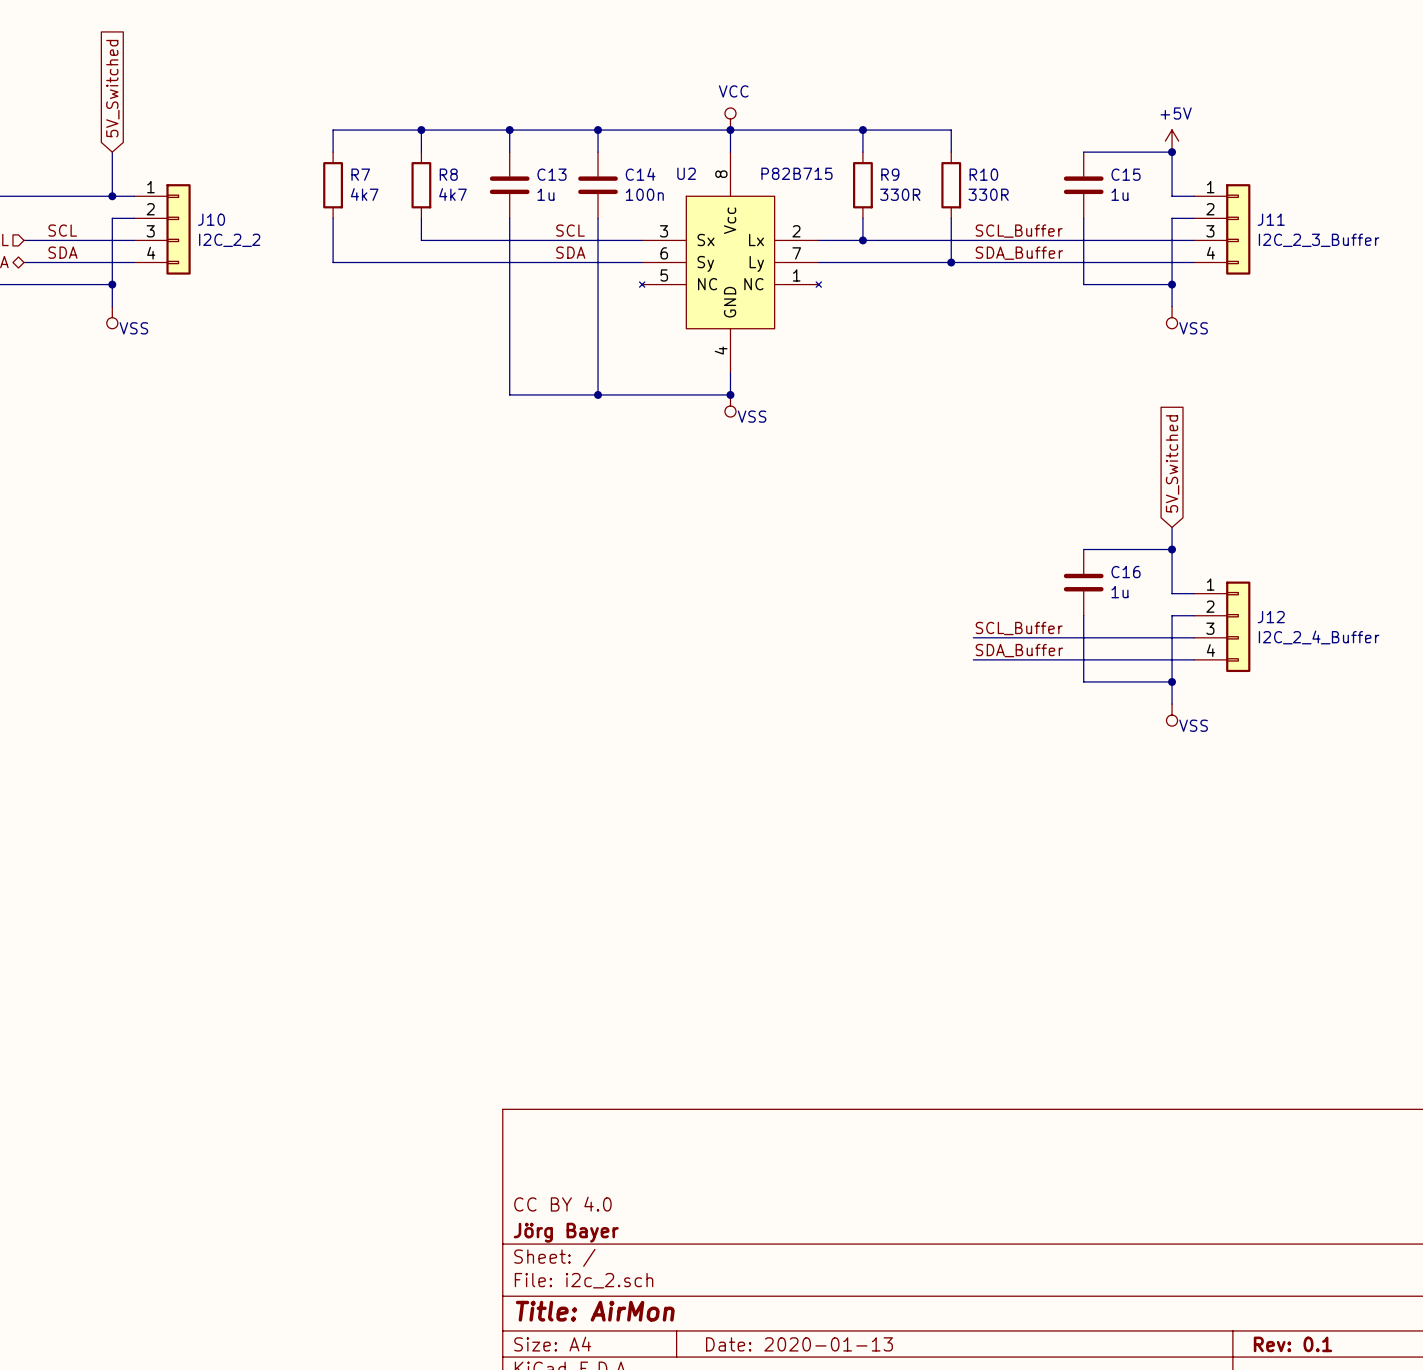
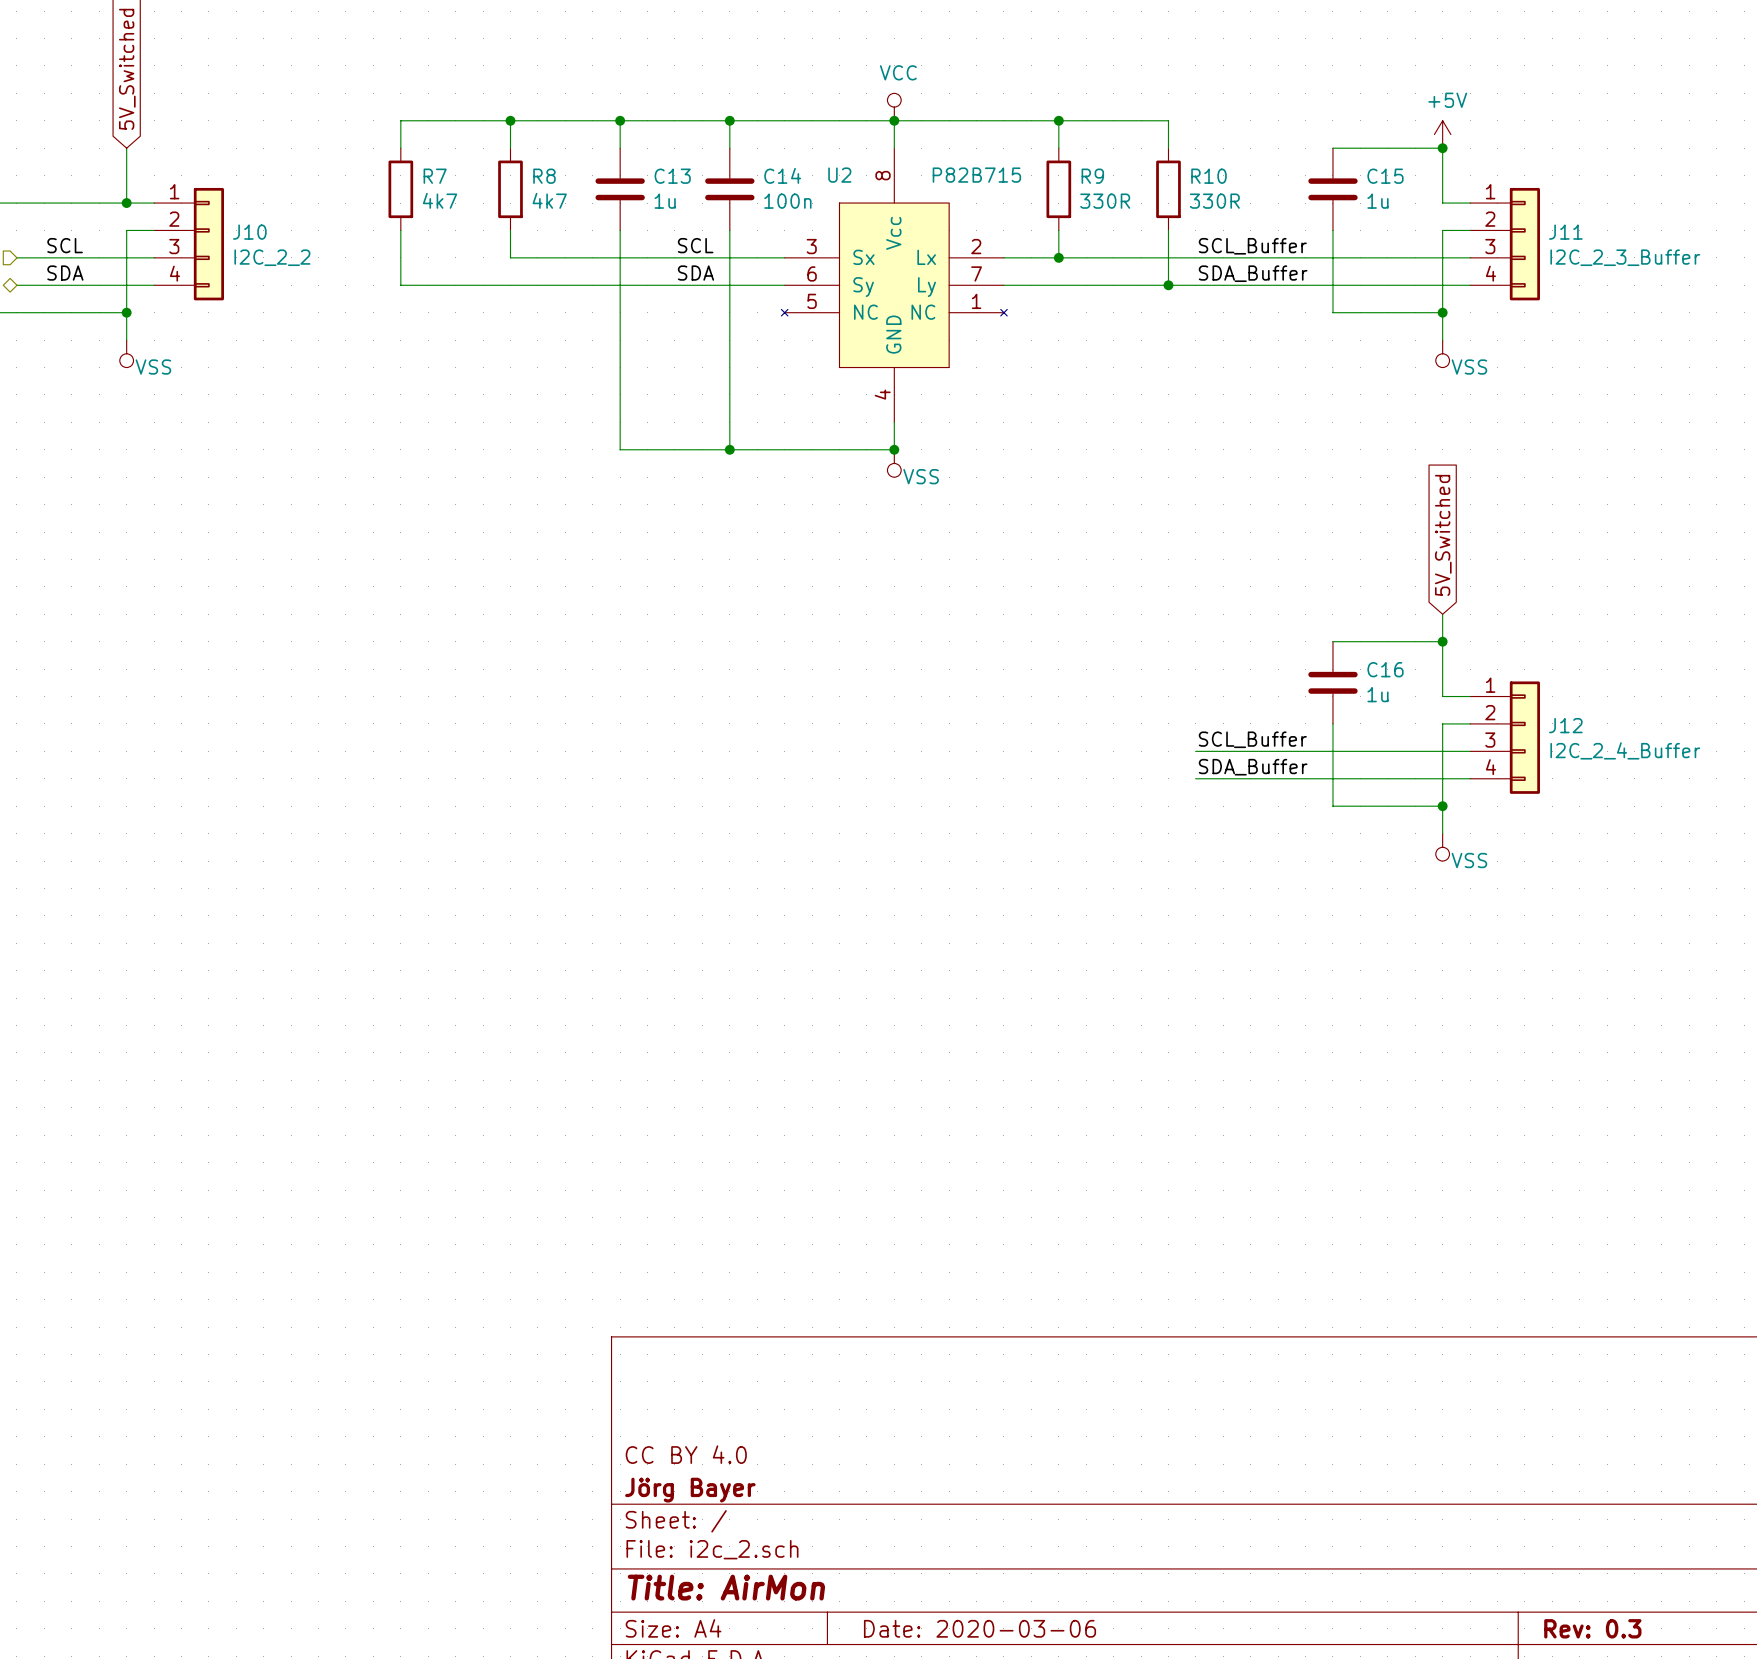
title block: Date: 2020-01-13 (799, 1344) -> Date: 2020-03-06 (980, 1628)
title block: Rev: 0.1 (1292, 1344) -> Rev: 0.3 (1592, 1628)

